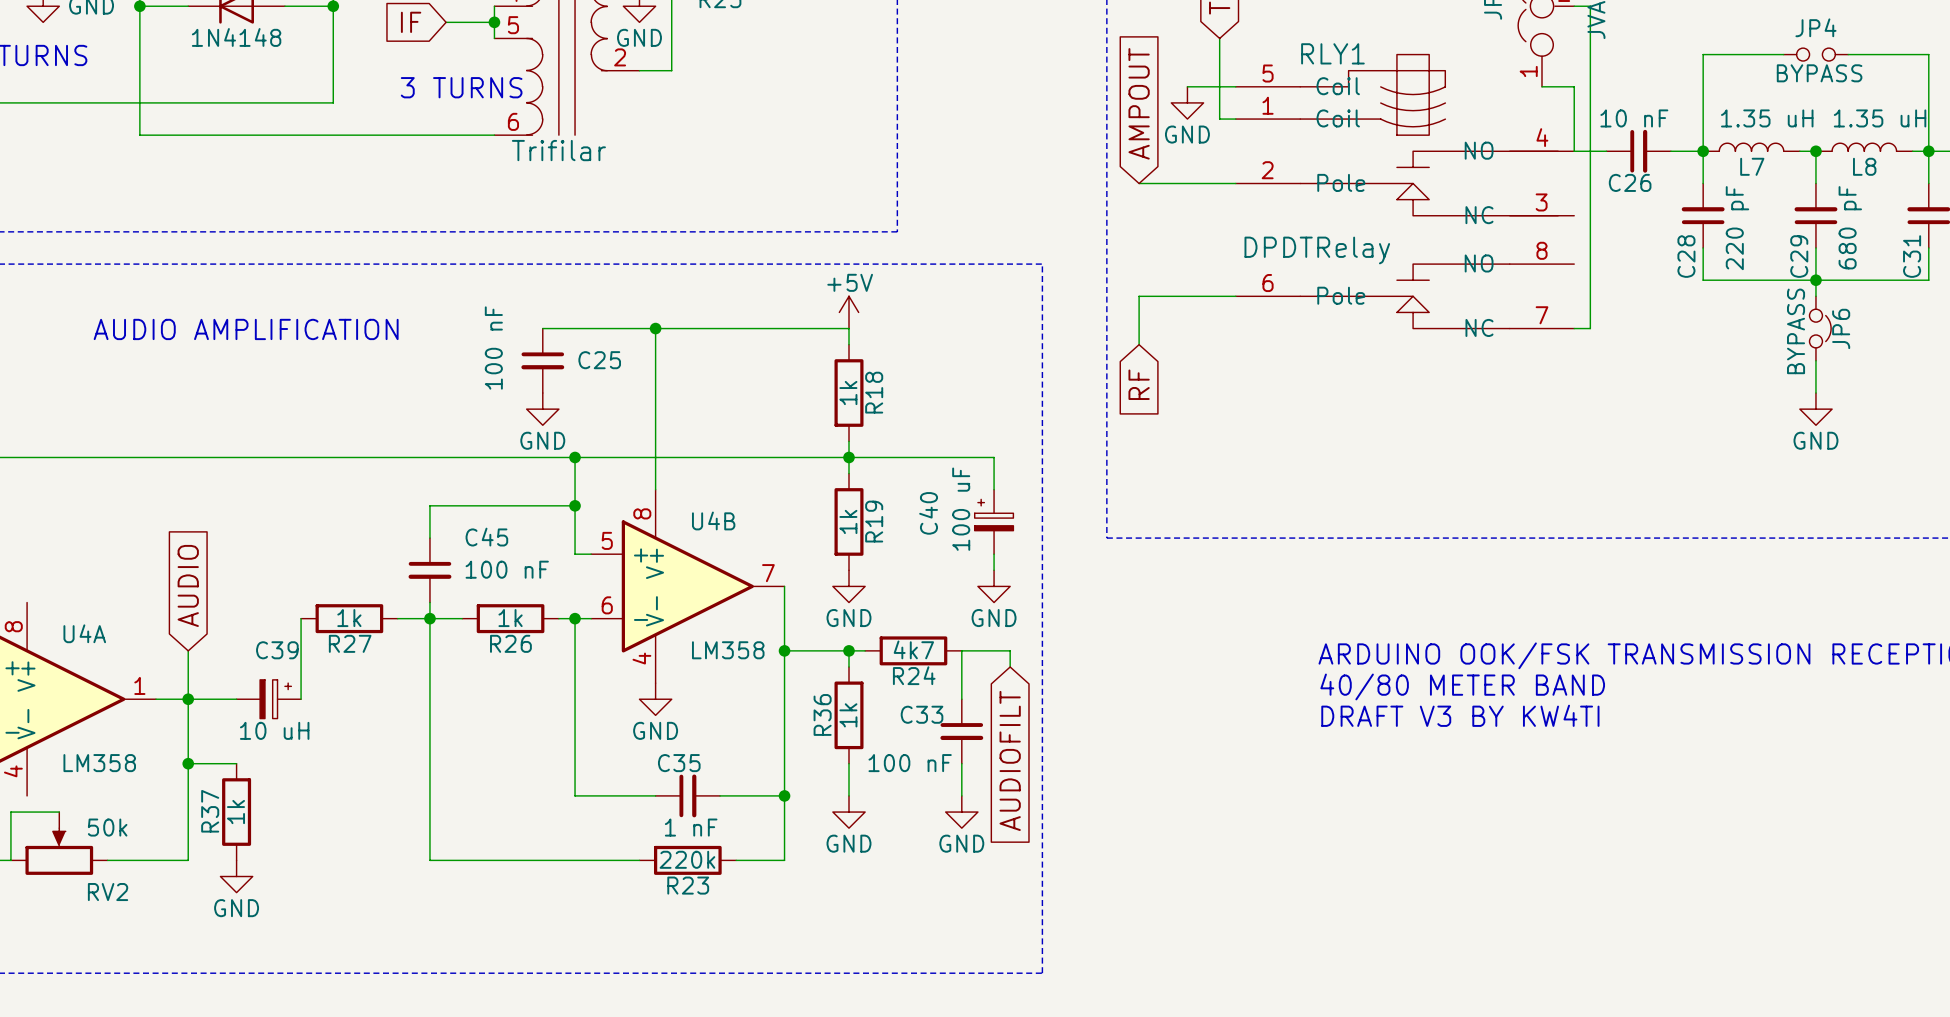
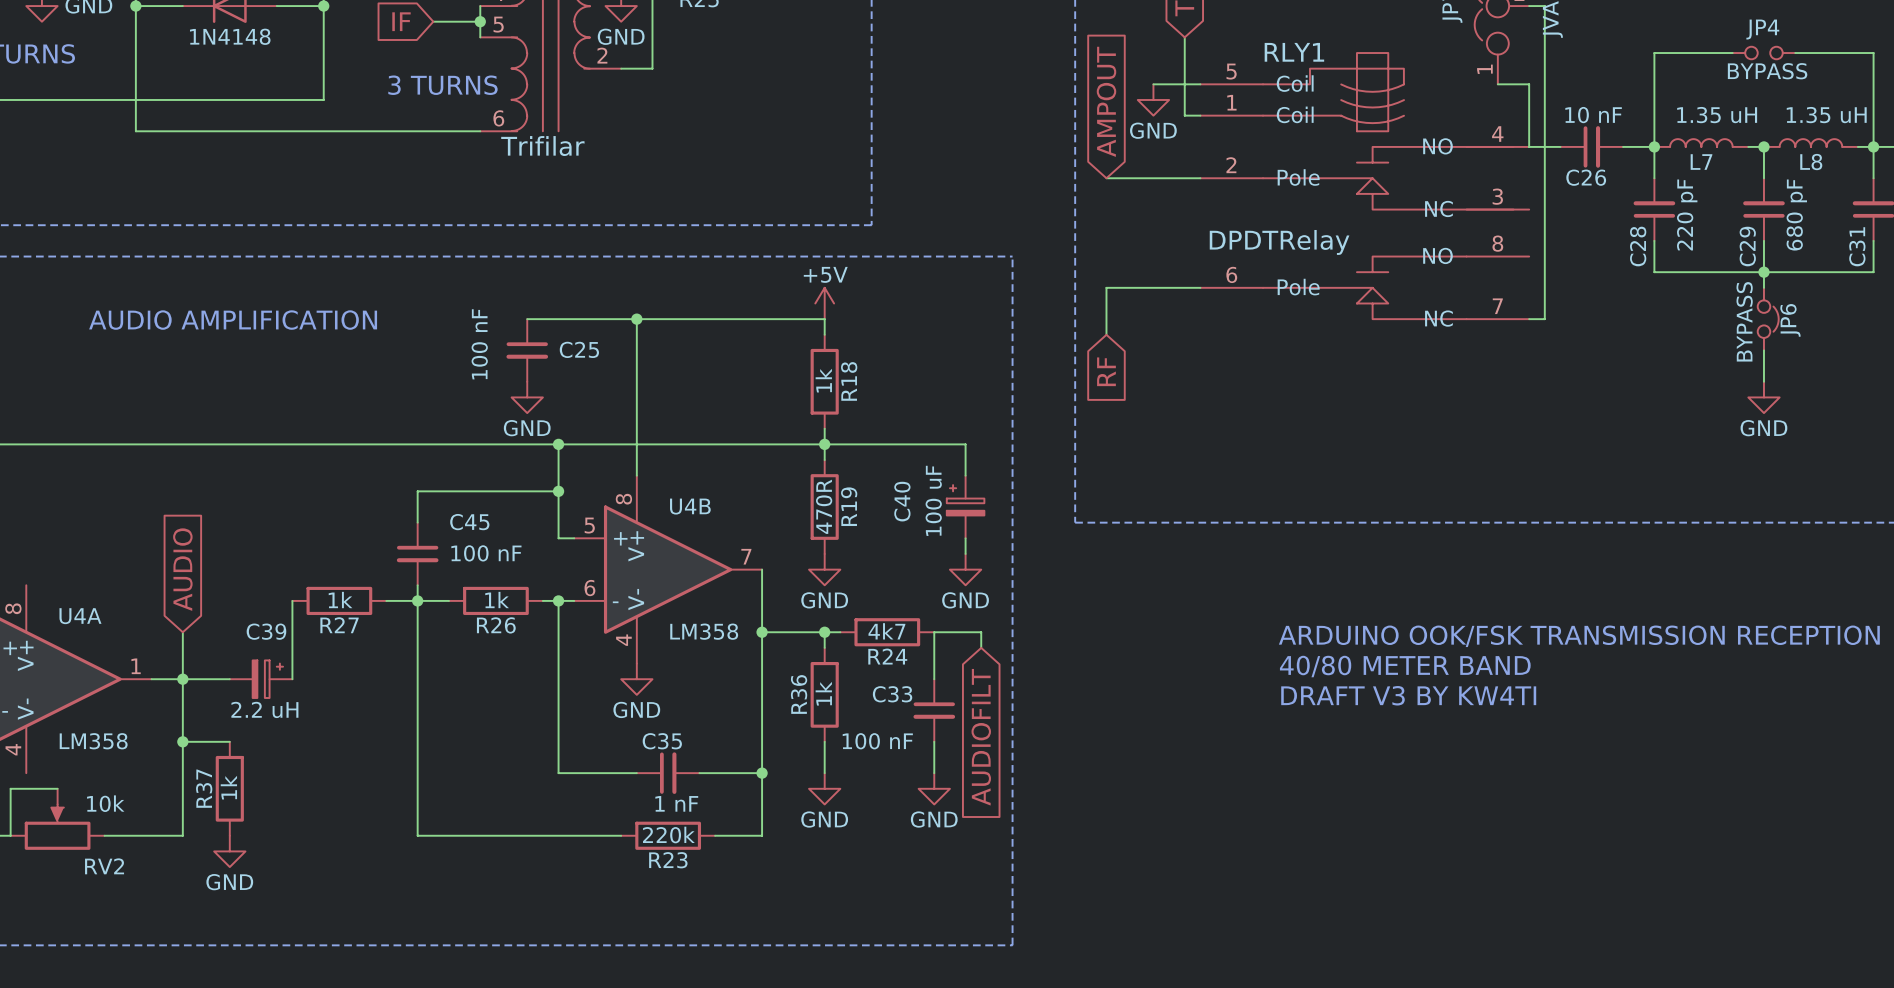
R19 value: 1k (848, 521) -> 470R (824, 506)
C39 value: 10 uH (274, 730) -> 2.2 uH (264, 709)
RV2 value: 50k (107, 827) -> 10k (105, 803)

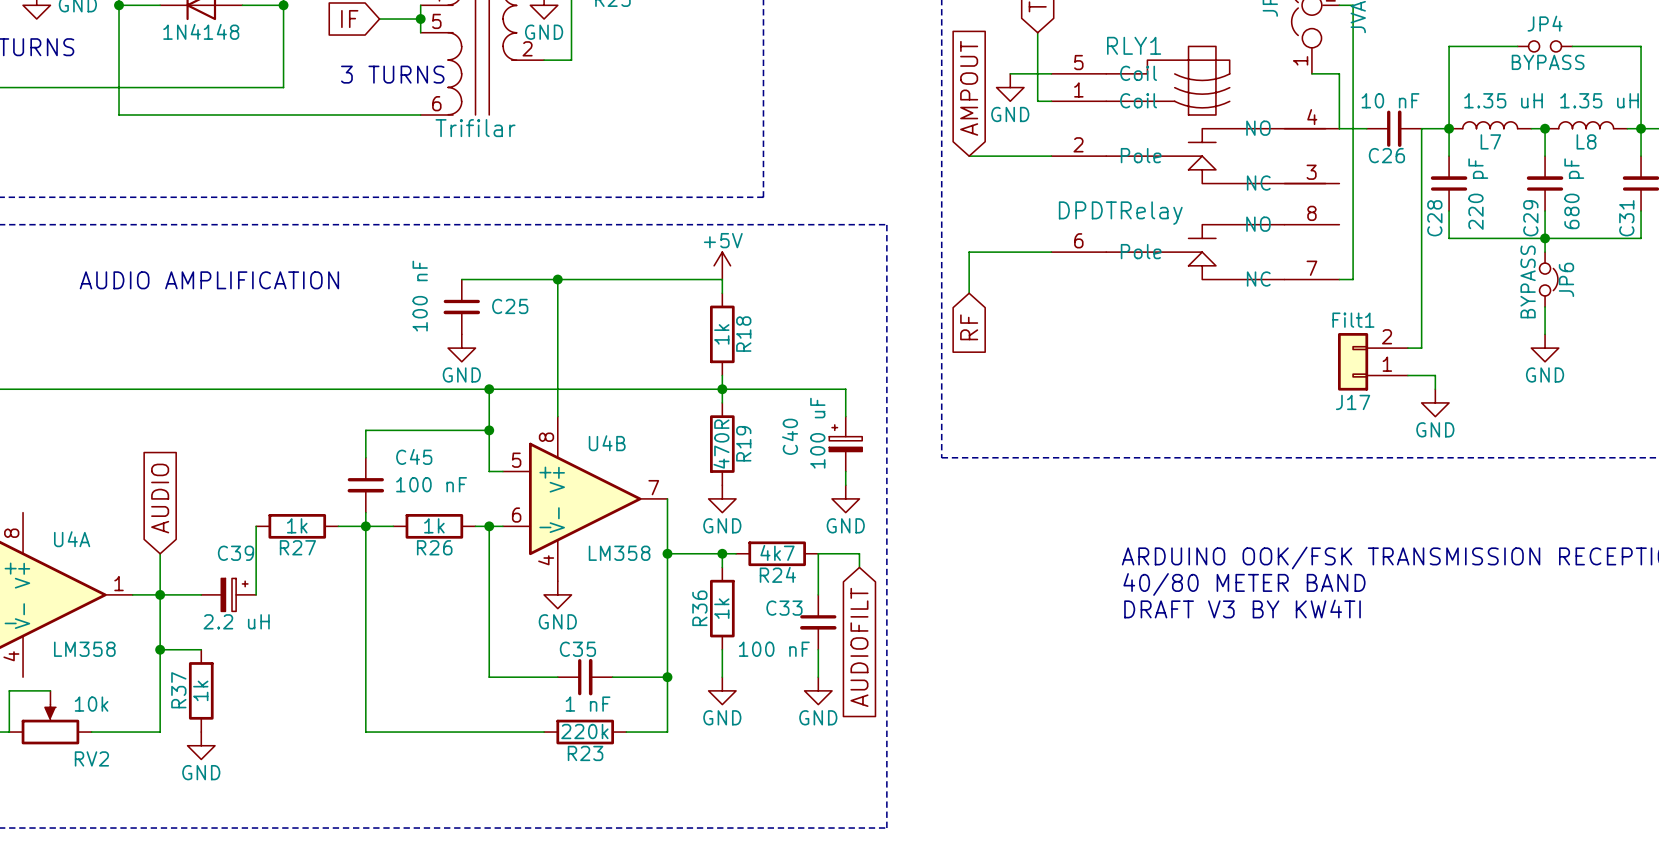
wire: none -> (1421, 128) (1421, 348) (1407, 348)
J17: none -> Filt1 (1372, 361)
wire: none -> (1407, 375) (1435, 375) (1435, 389)
power symbol: none -> GND (1435, 402)

